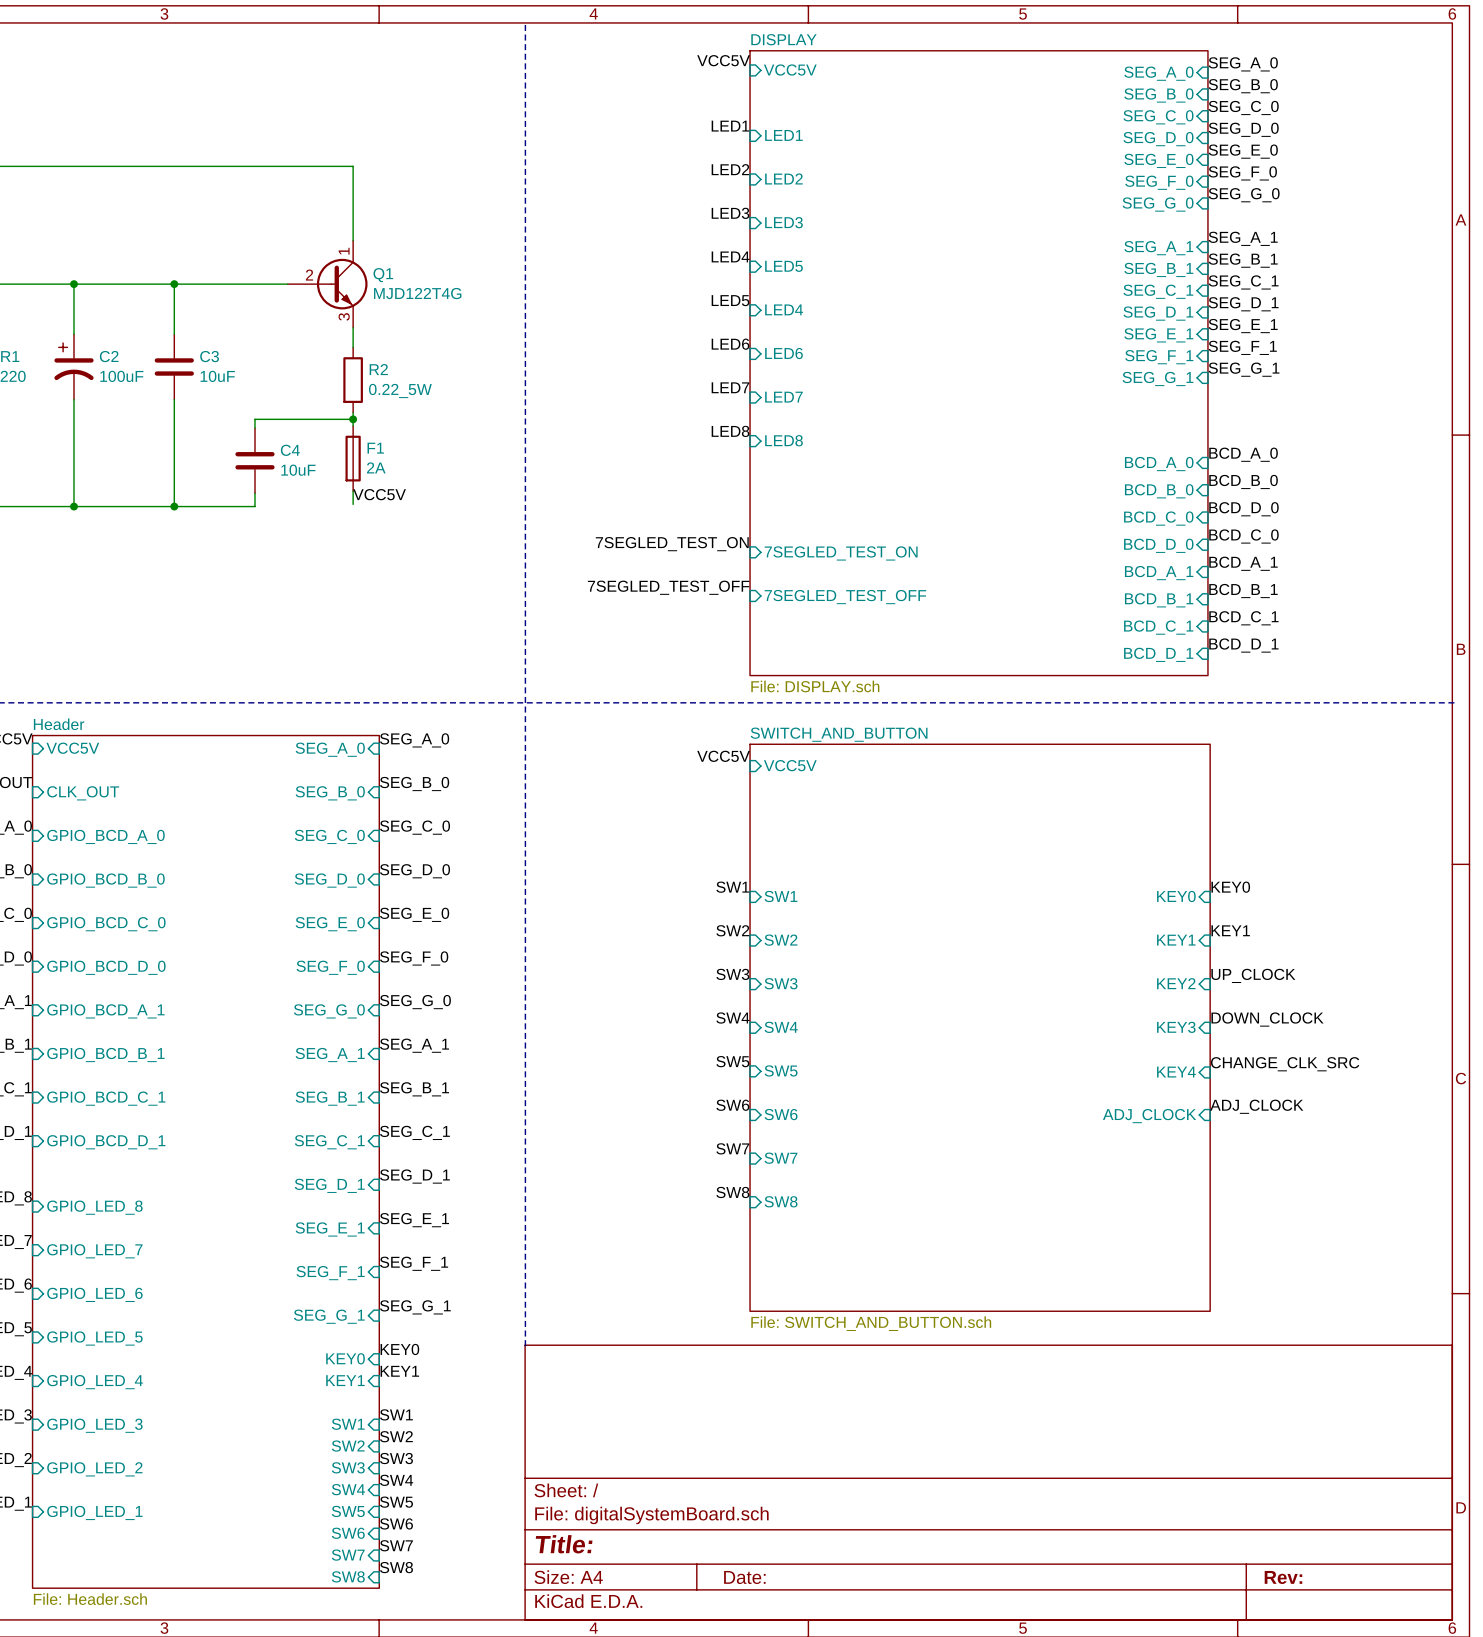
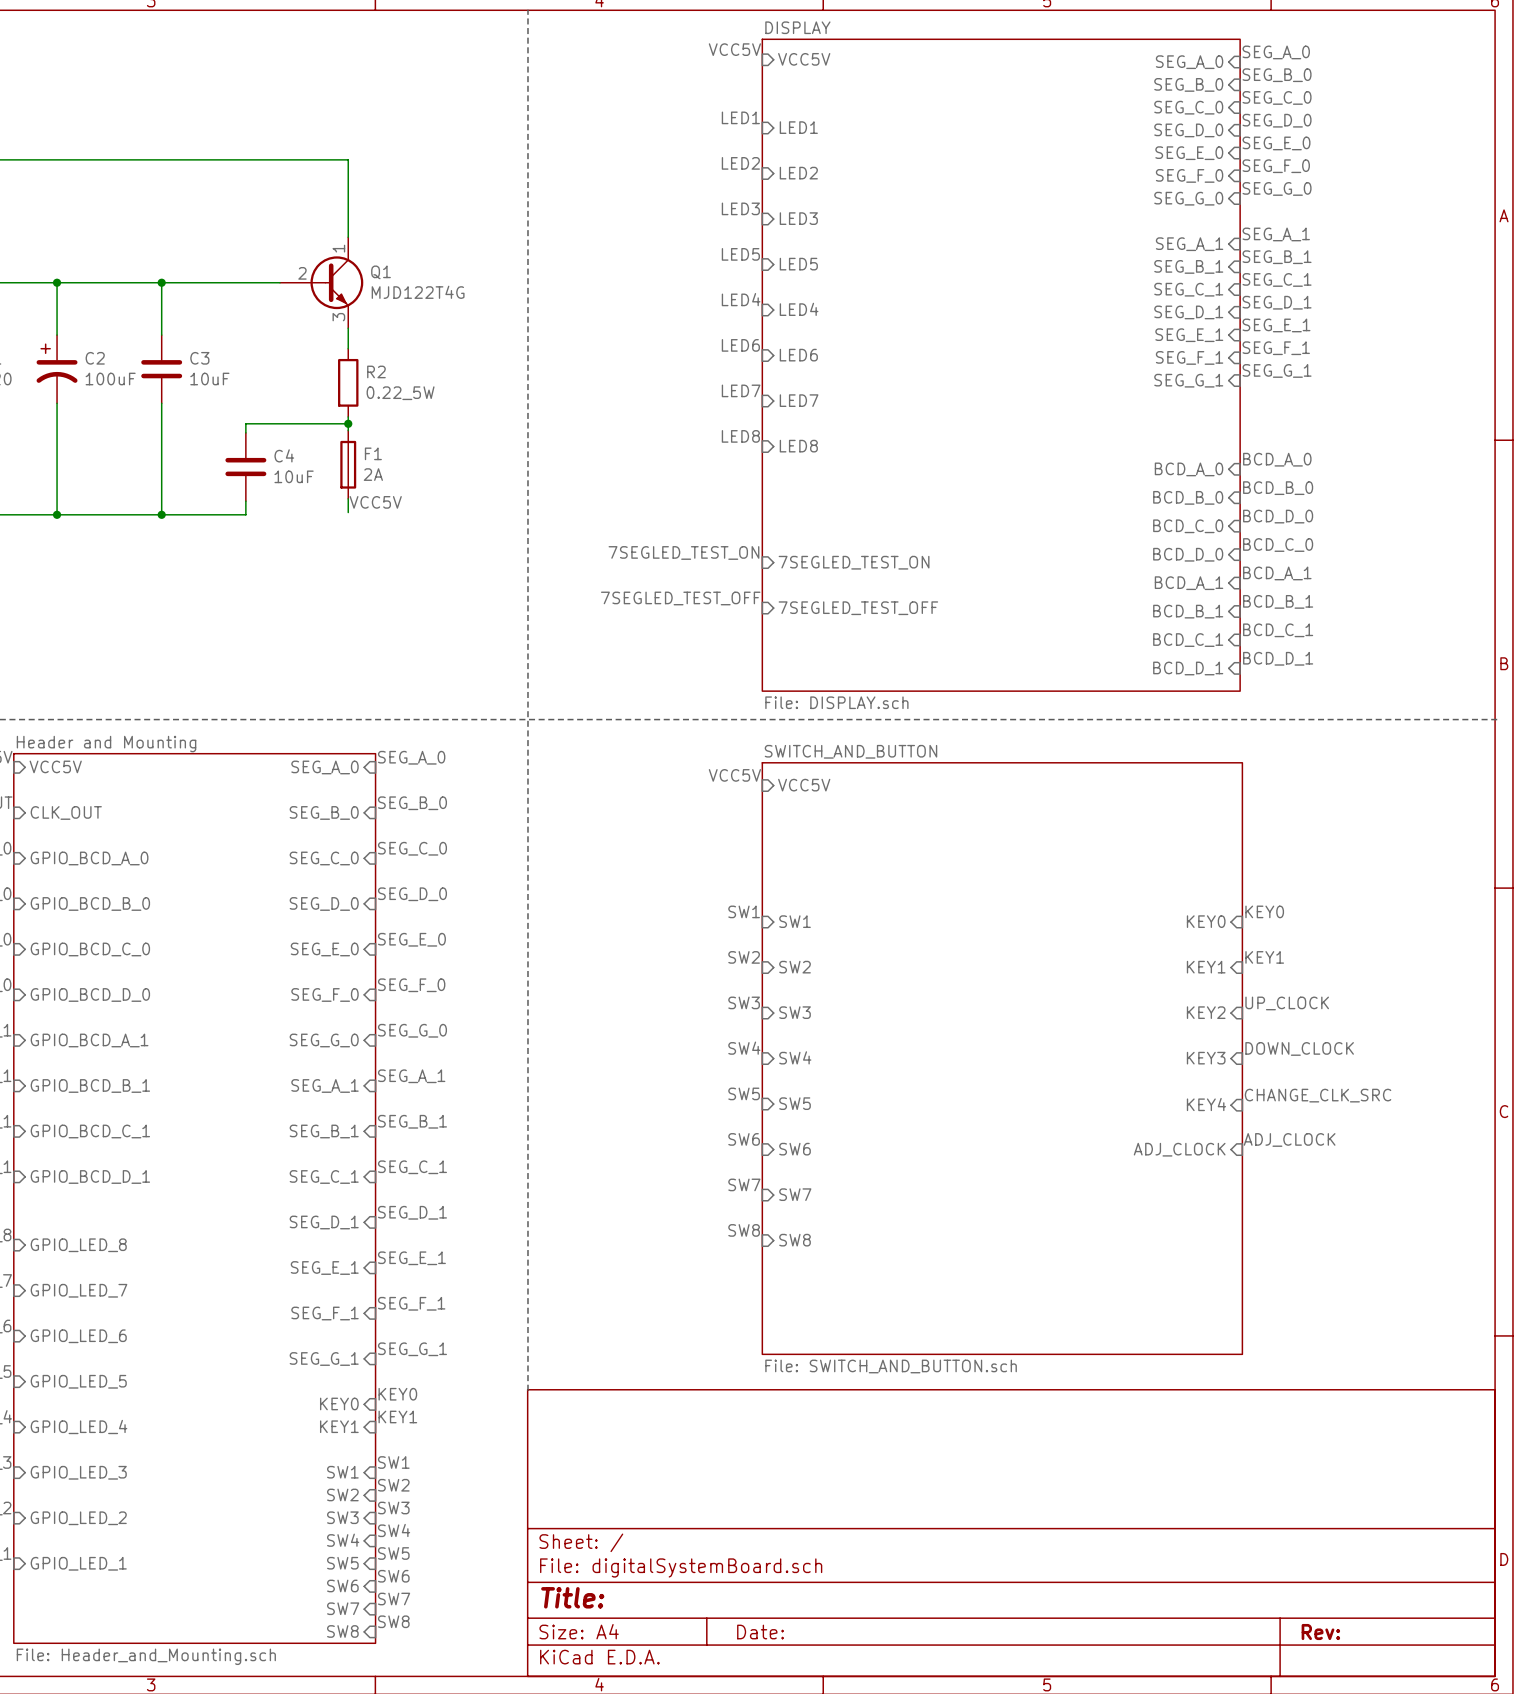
label: LED4 (730, 256) -> LED5 (740, 254)
label: LED5 (730, 300) -> LED4 (741, 299)
sheet Header name: Header (59, 724) -> Header and Mounting (106, 744)
sheet Header value: File: Header.sch (90, 1599) -> File: Header_and_Mounting.sch (146, 1656)

